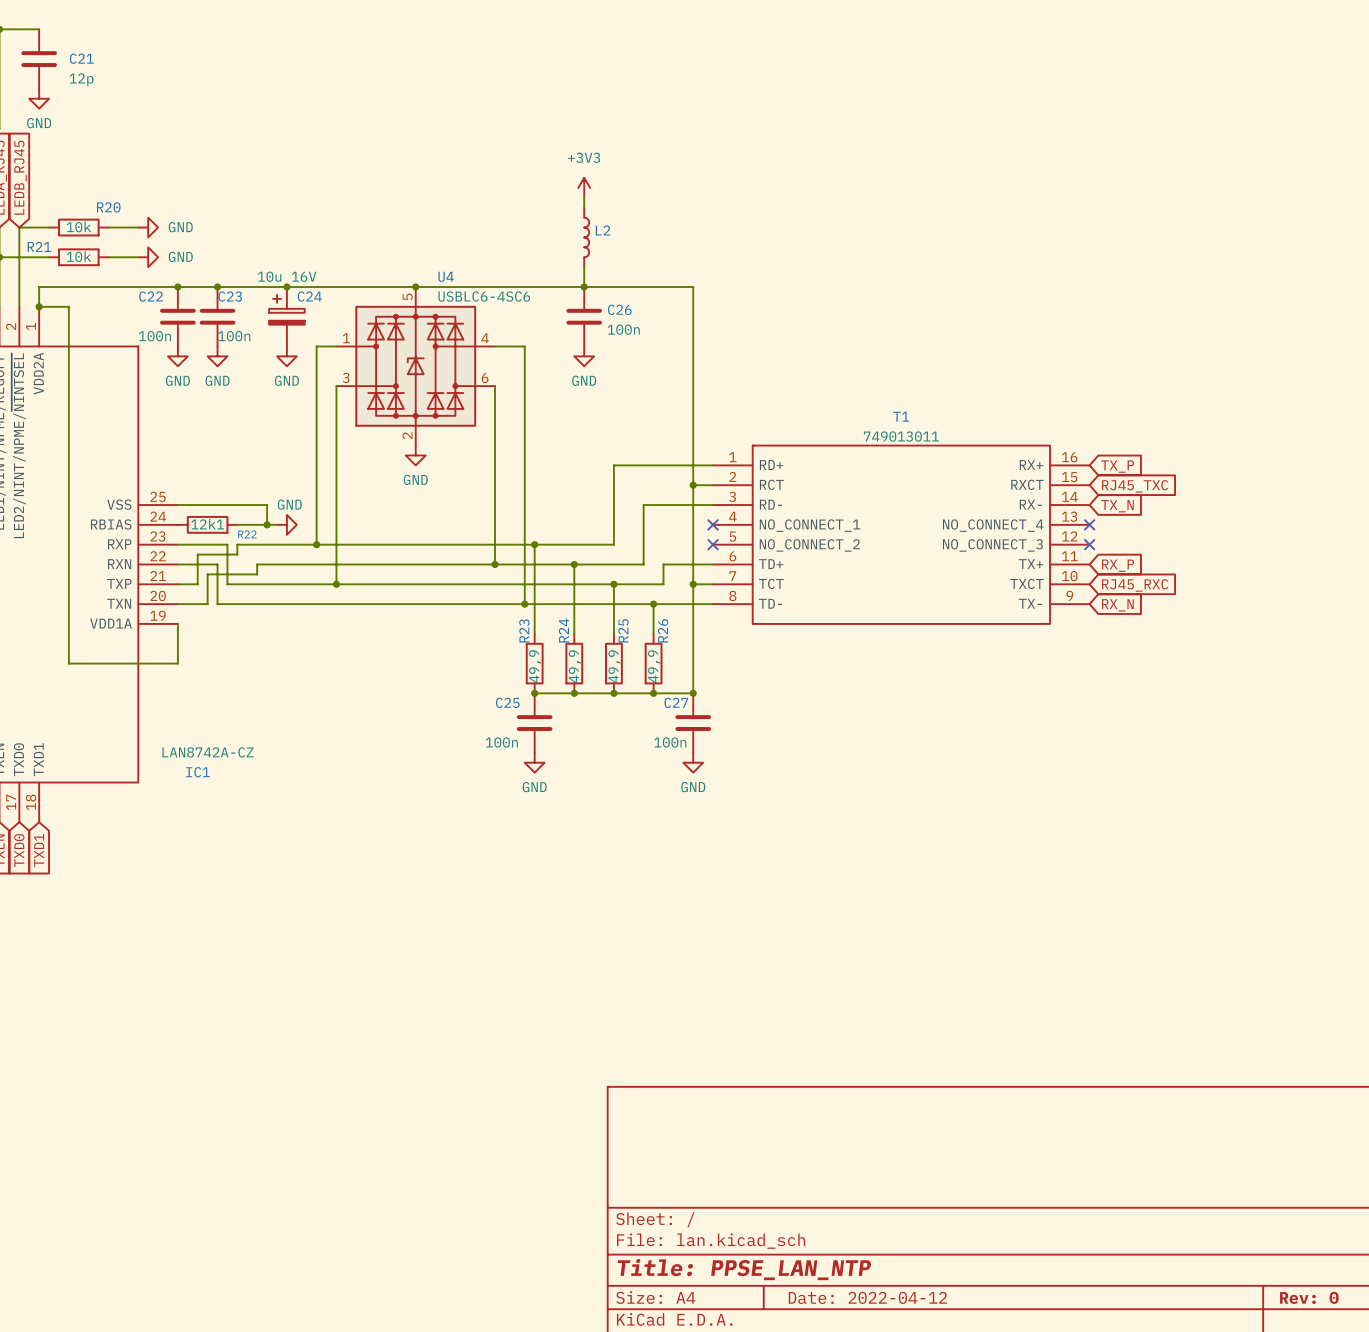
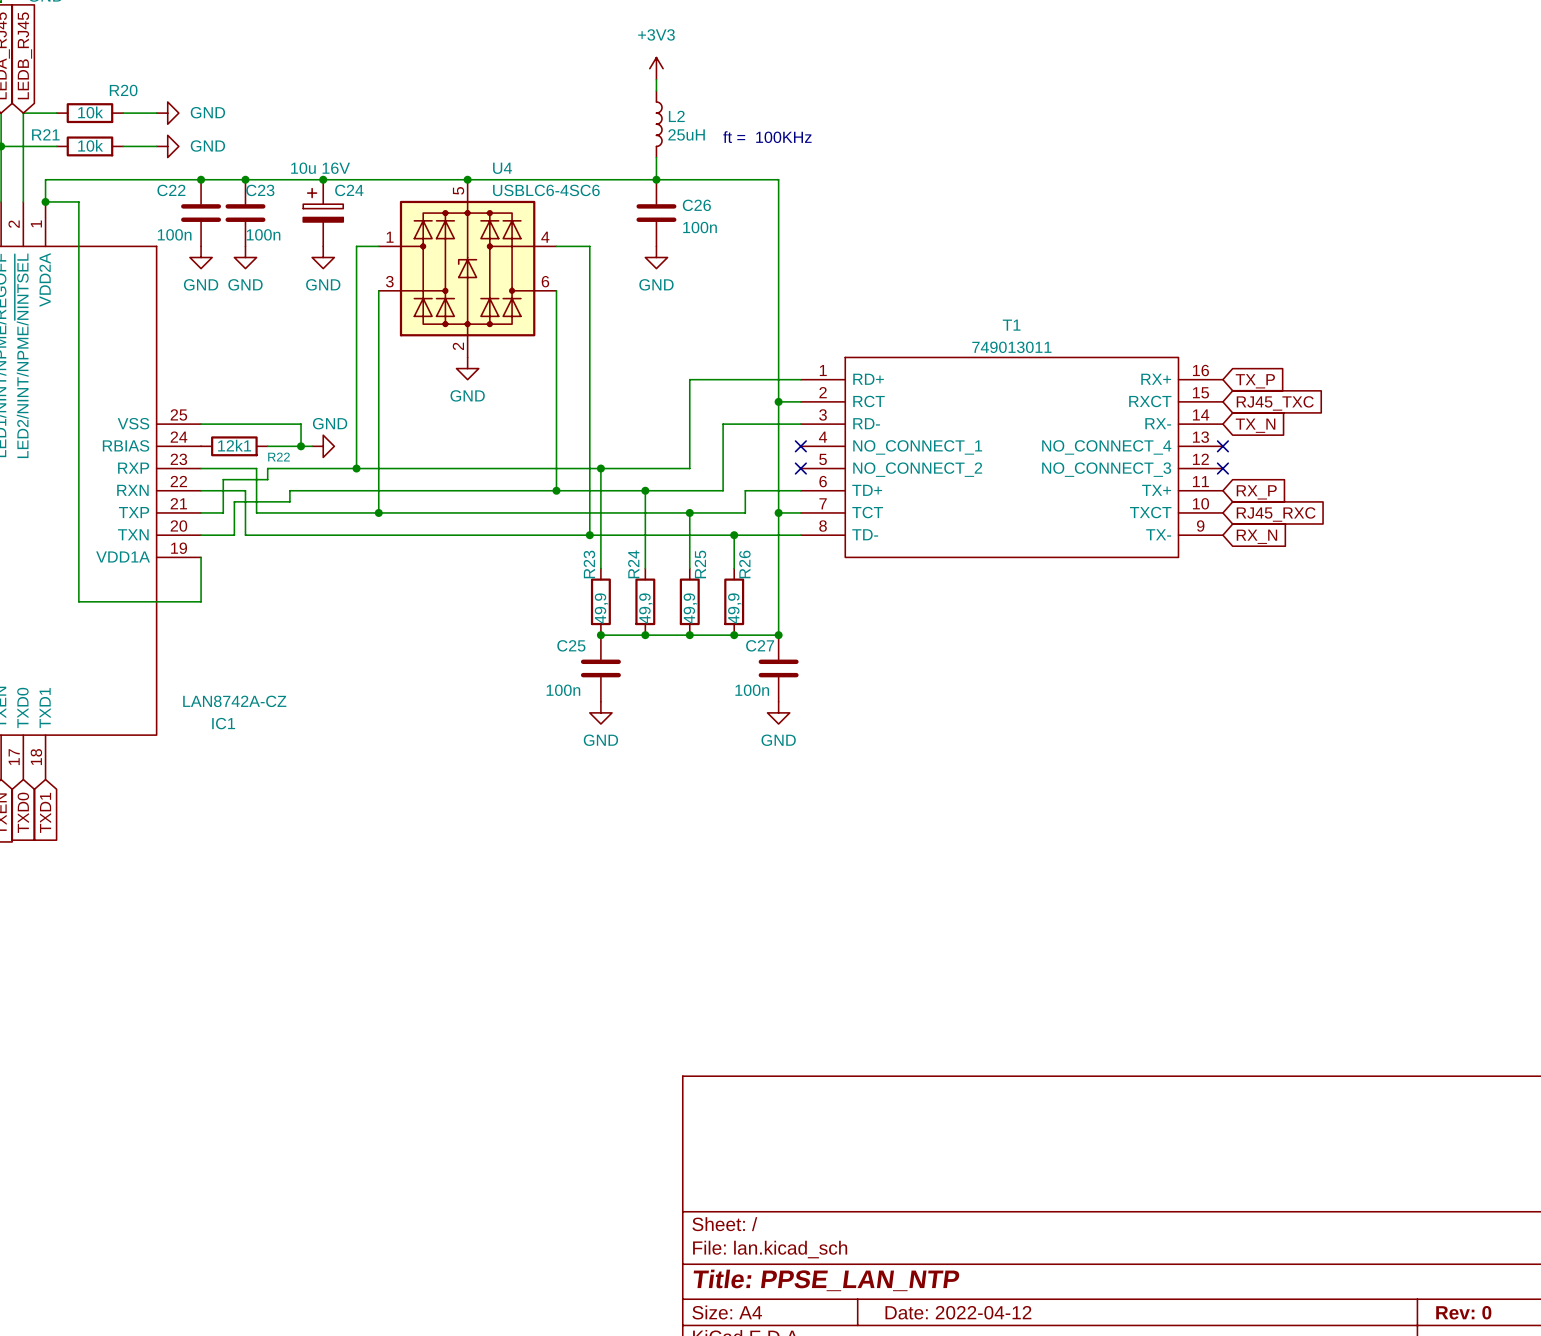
L2 value: none -> 25uH (686, 134)
text: none -> ft = 100KHz (767, 137)

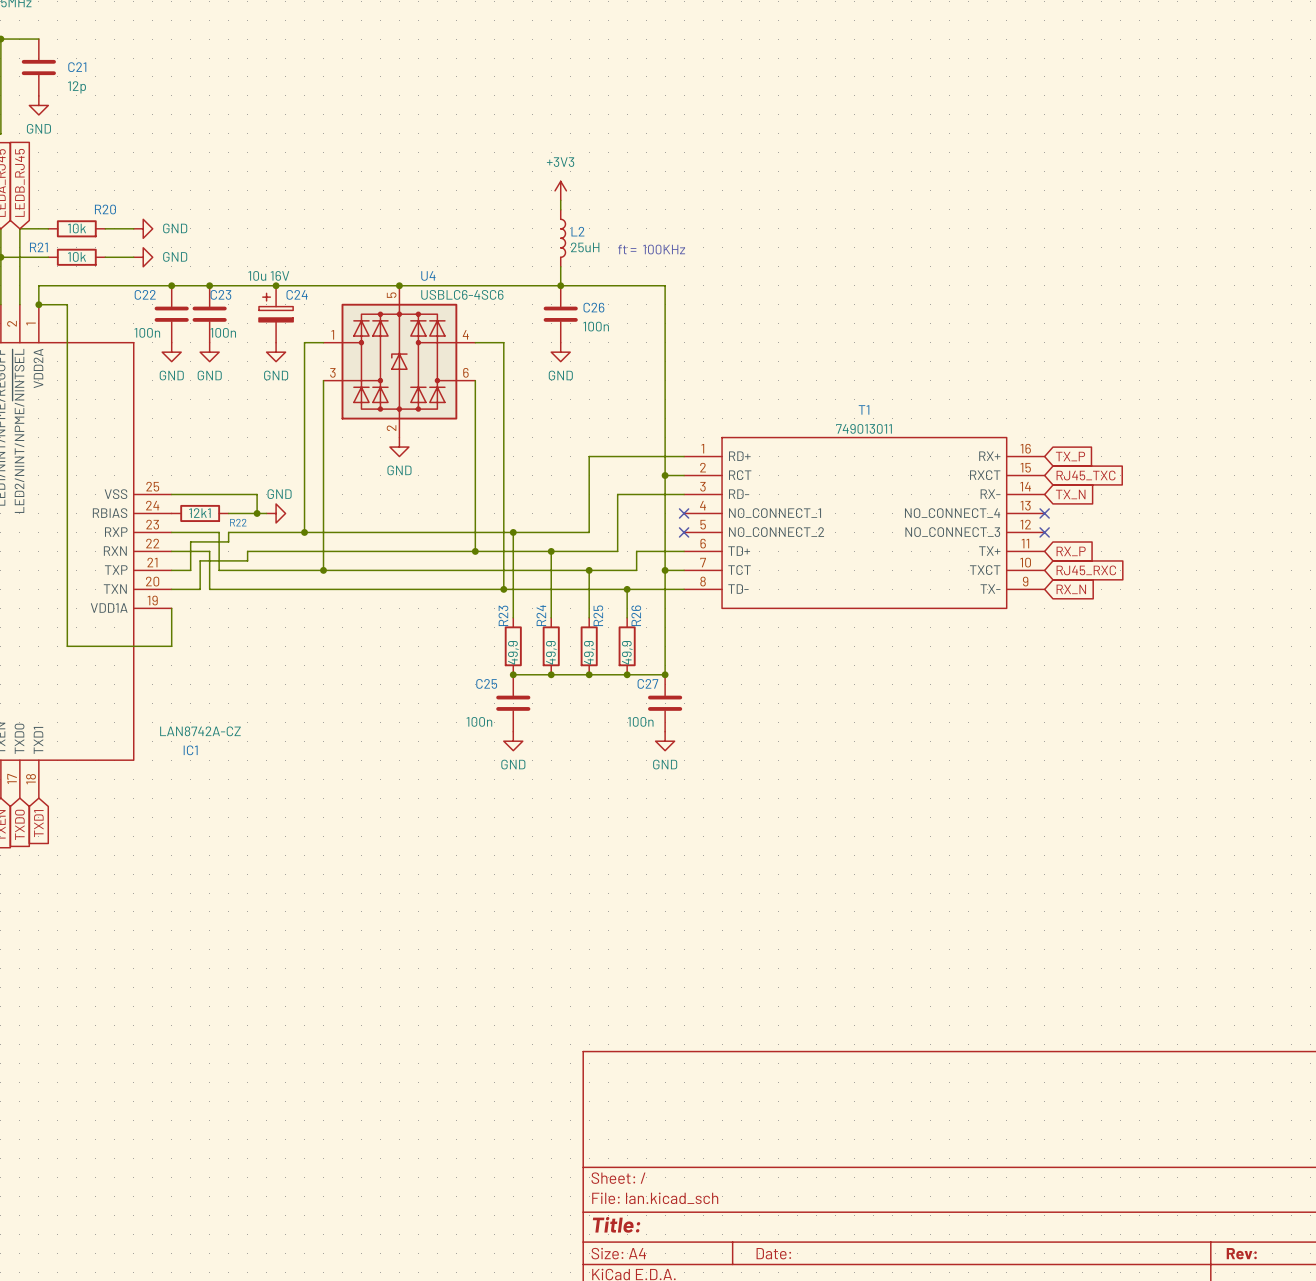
title block: Title: PPSE_LAN_NTP (826, 1280) -> Title: (616, 1224)
title block: Date: 2022-04-12 (958, 1312) -> Date: (773, 1253)
title block: Rev: 0 (1463, 1312) -> Rev: (1241, 1253)

